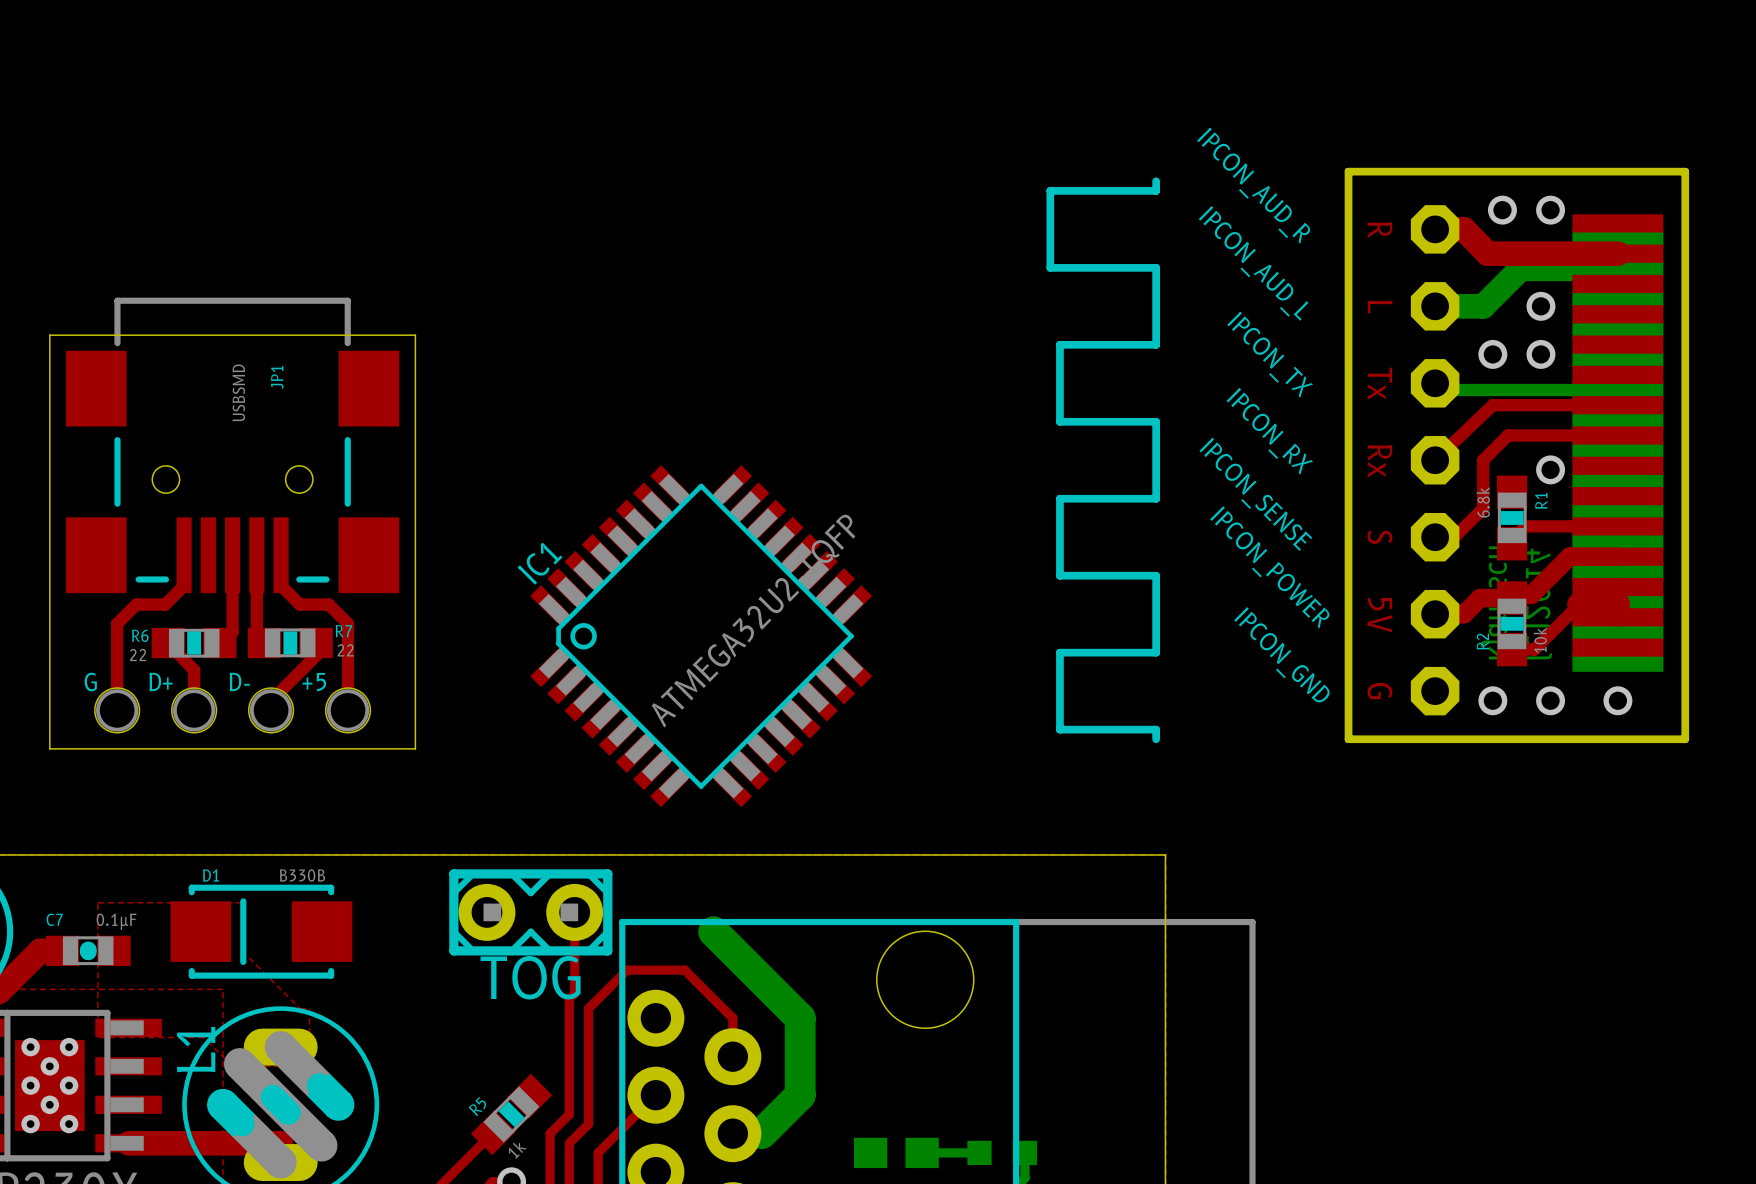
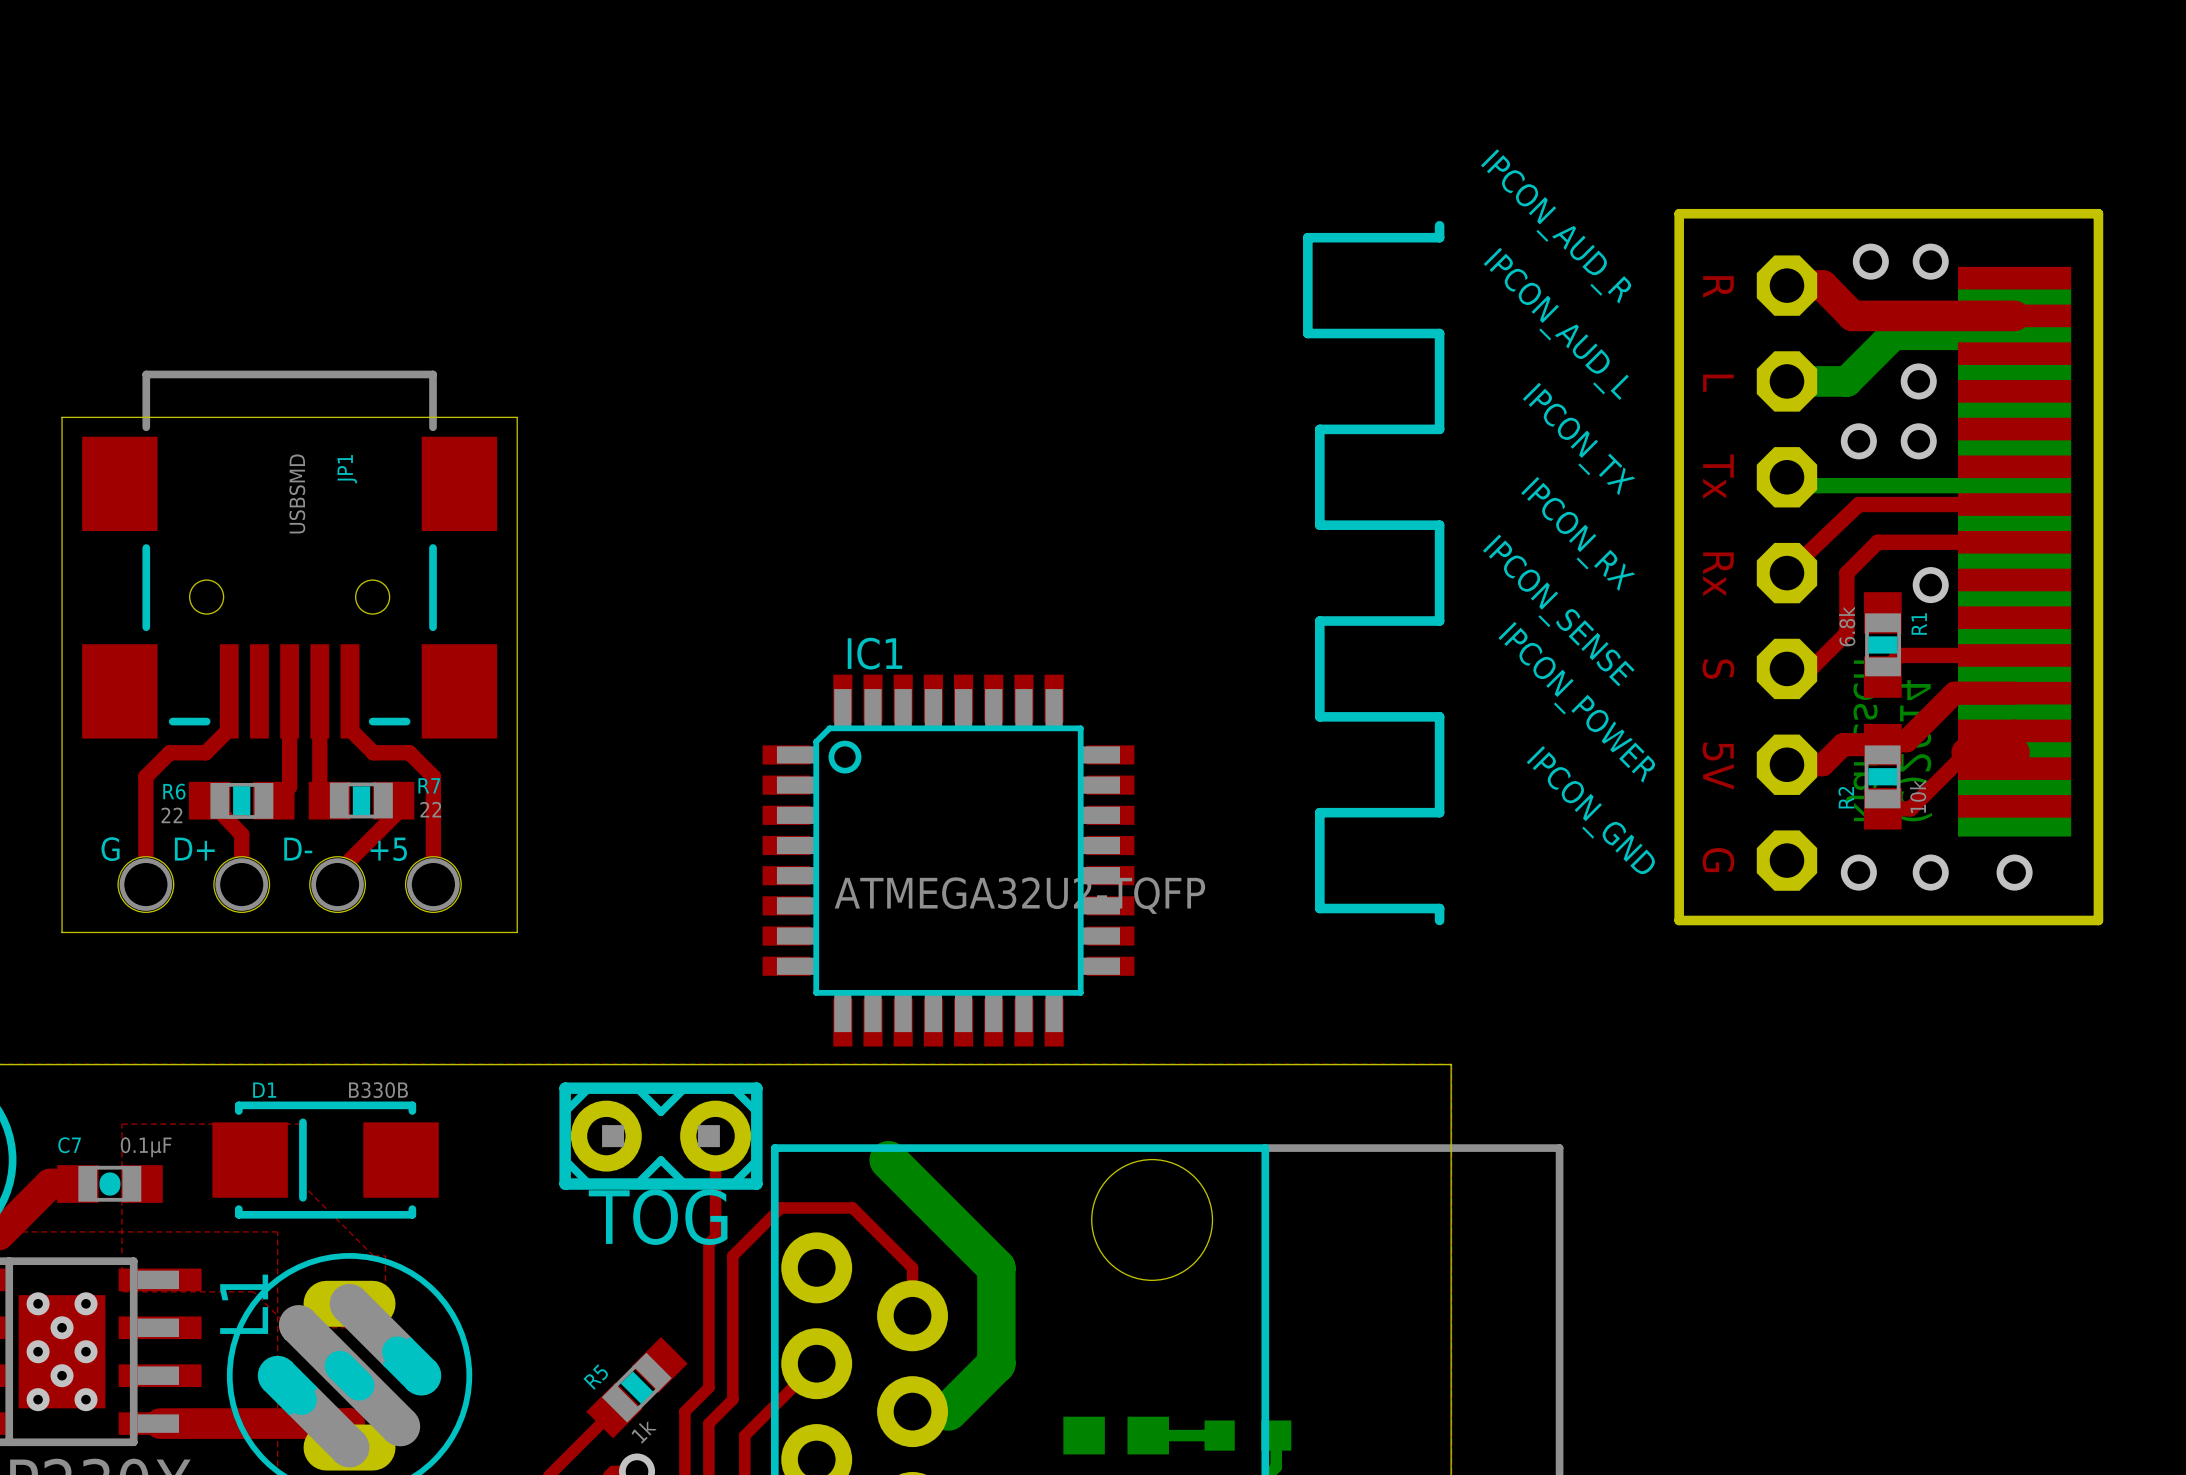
IC1 rotation: 0° (701, 636) -> 45° clockwise (948, 860)

